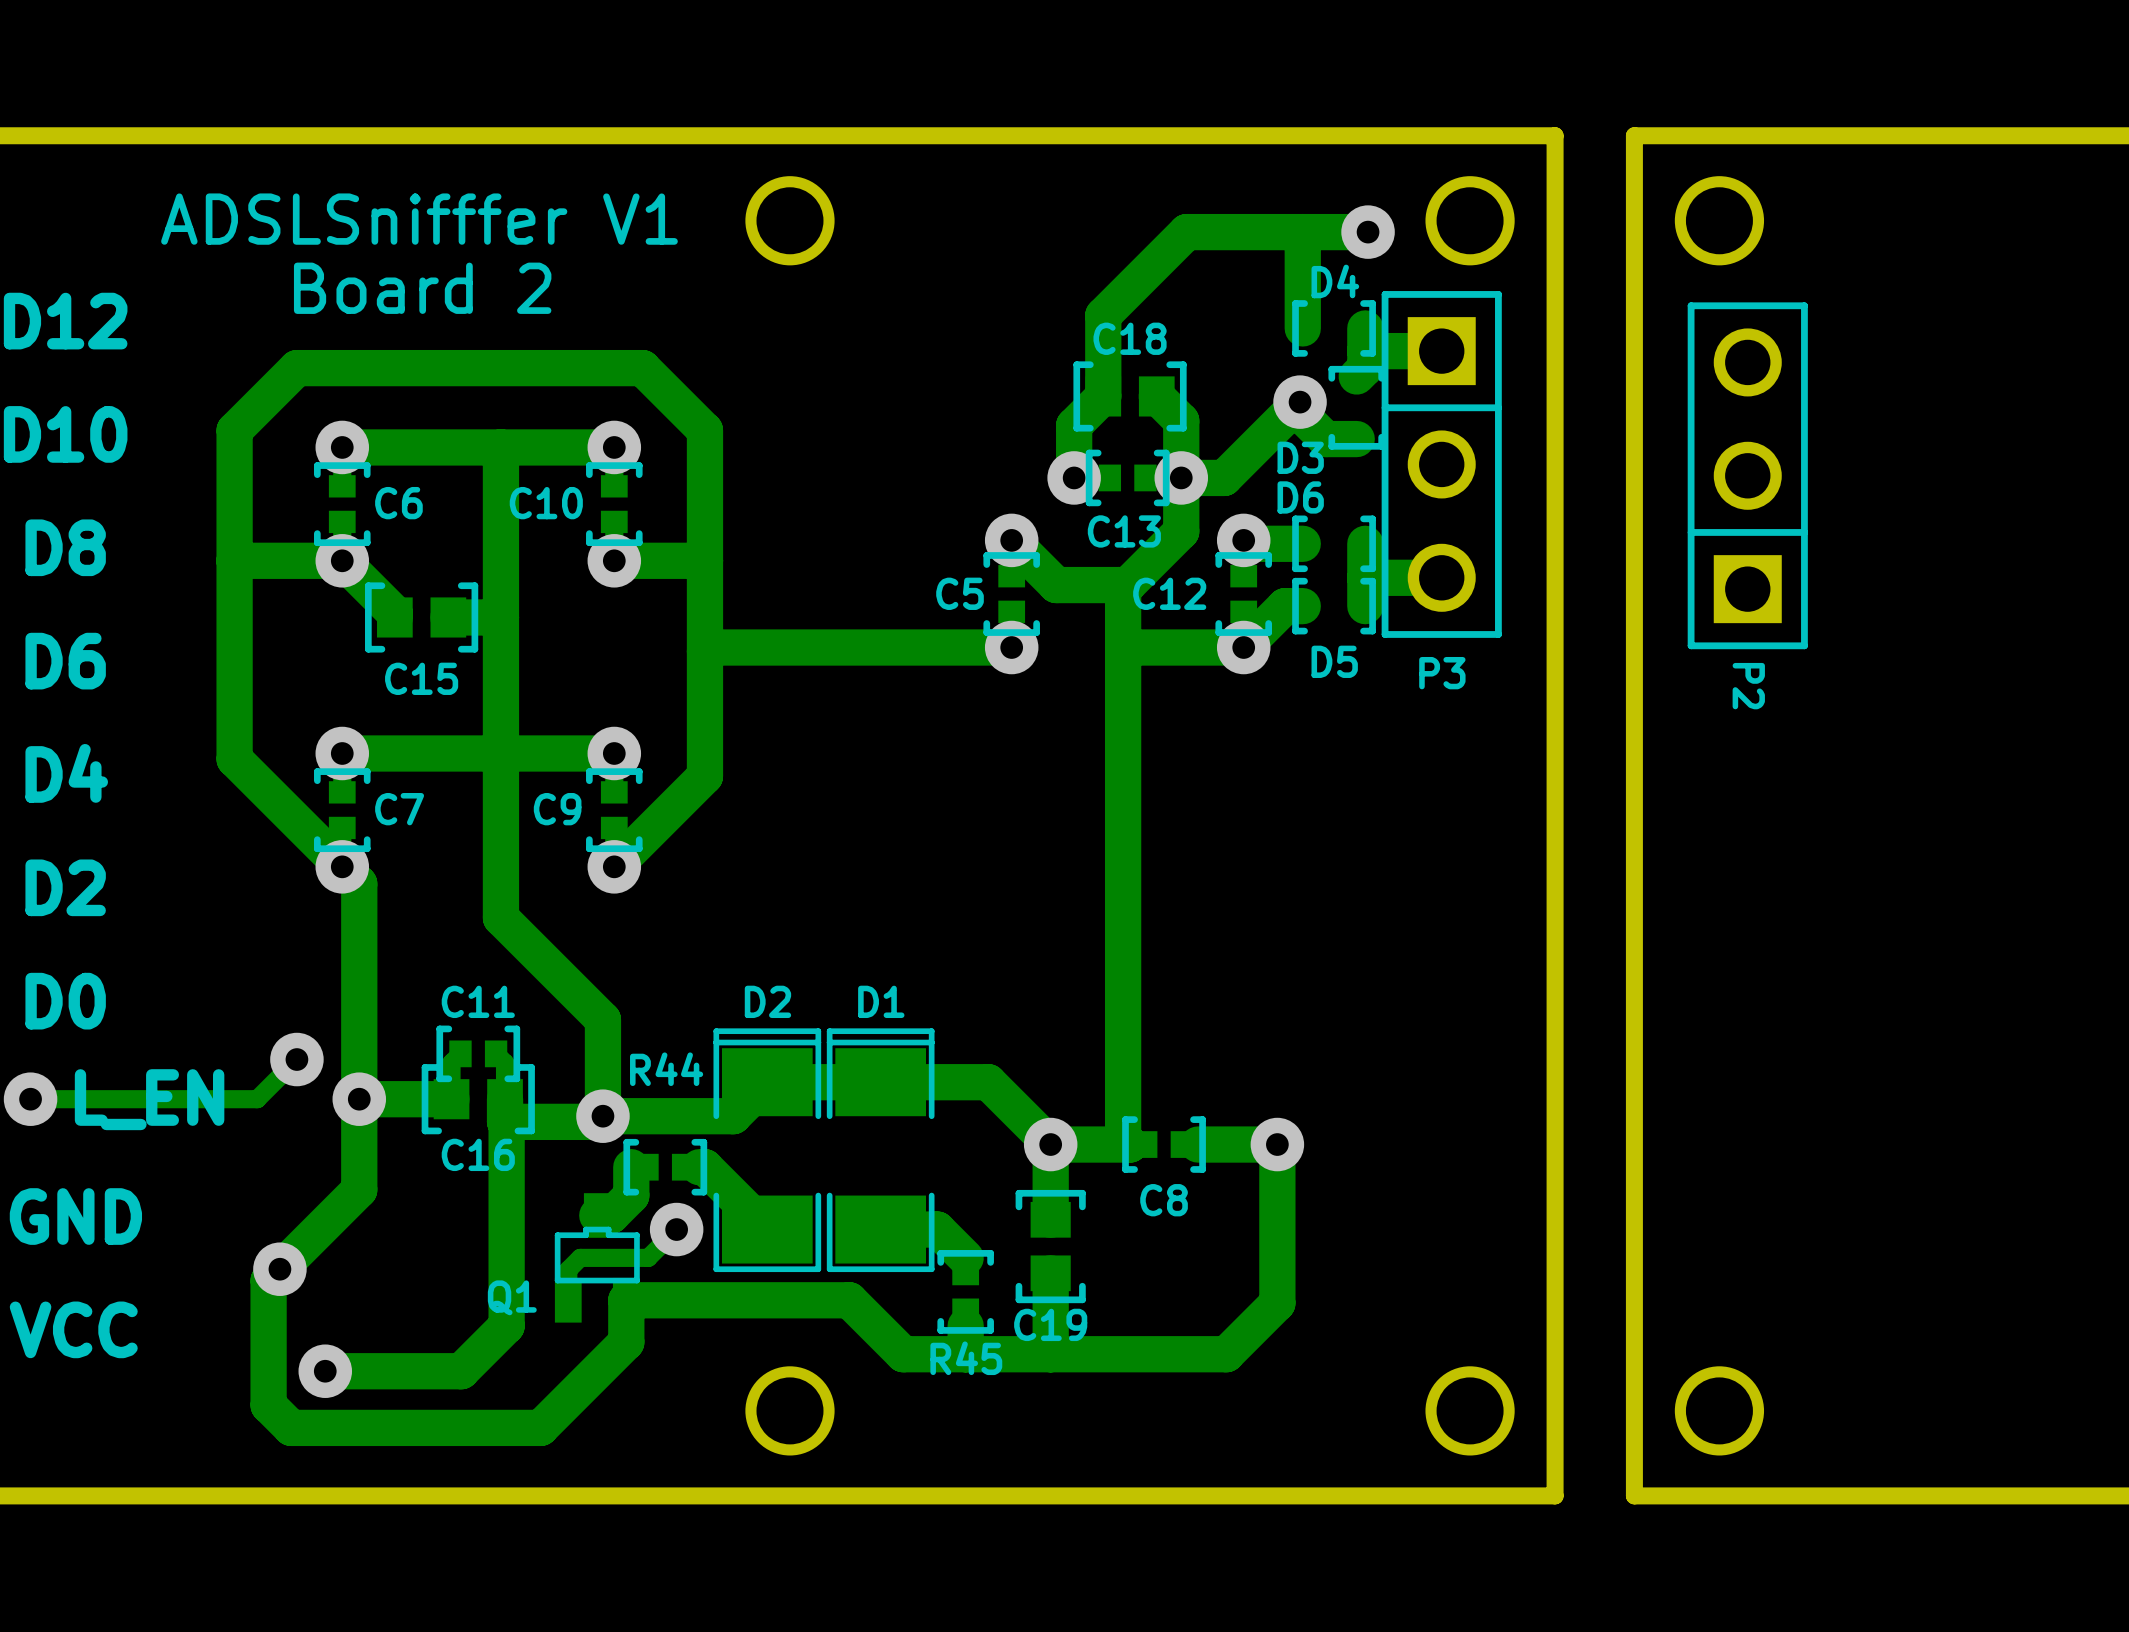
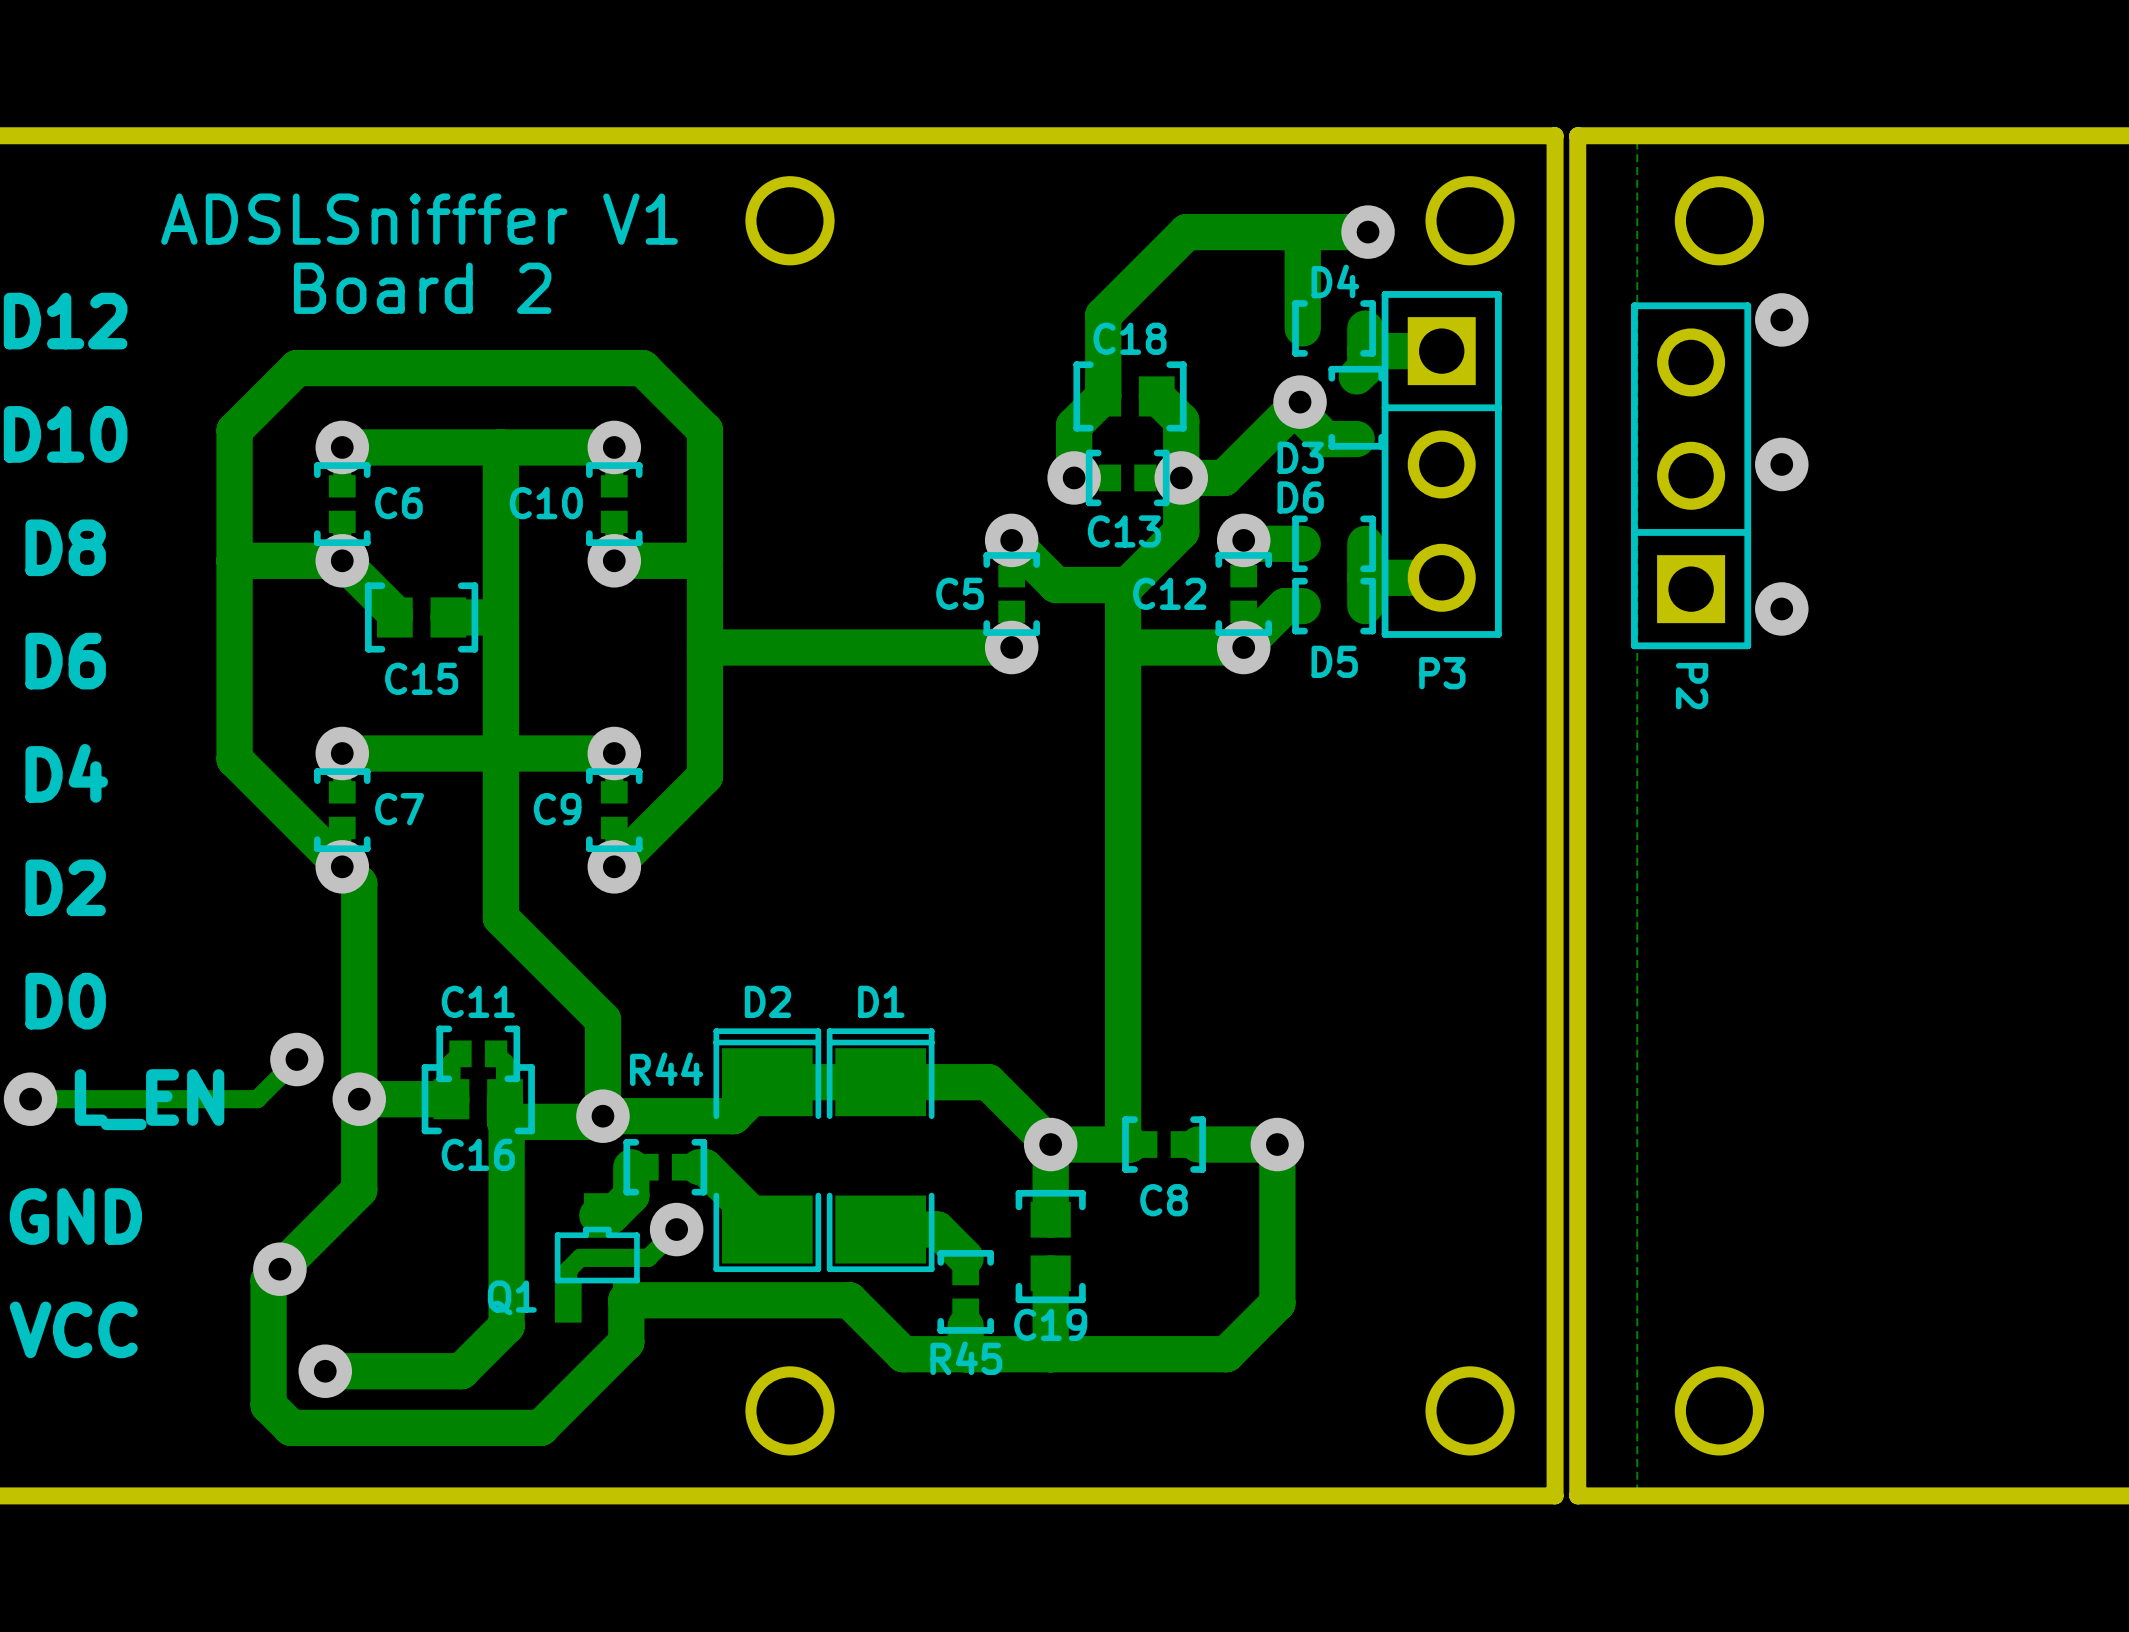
board edge: (1634, 135) (1634, 1495) -> (1634, 135) (1577, 135) (1577, 1495) (1634, 1495)
via: none -> (1781, 319)
via: none -> (1781, 464)
P2 position: (1747, 475) -> (1691, 475)
via: none -> (1781, 608)

